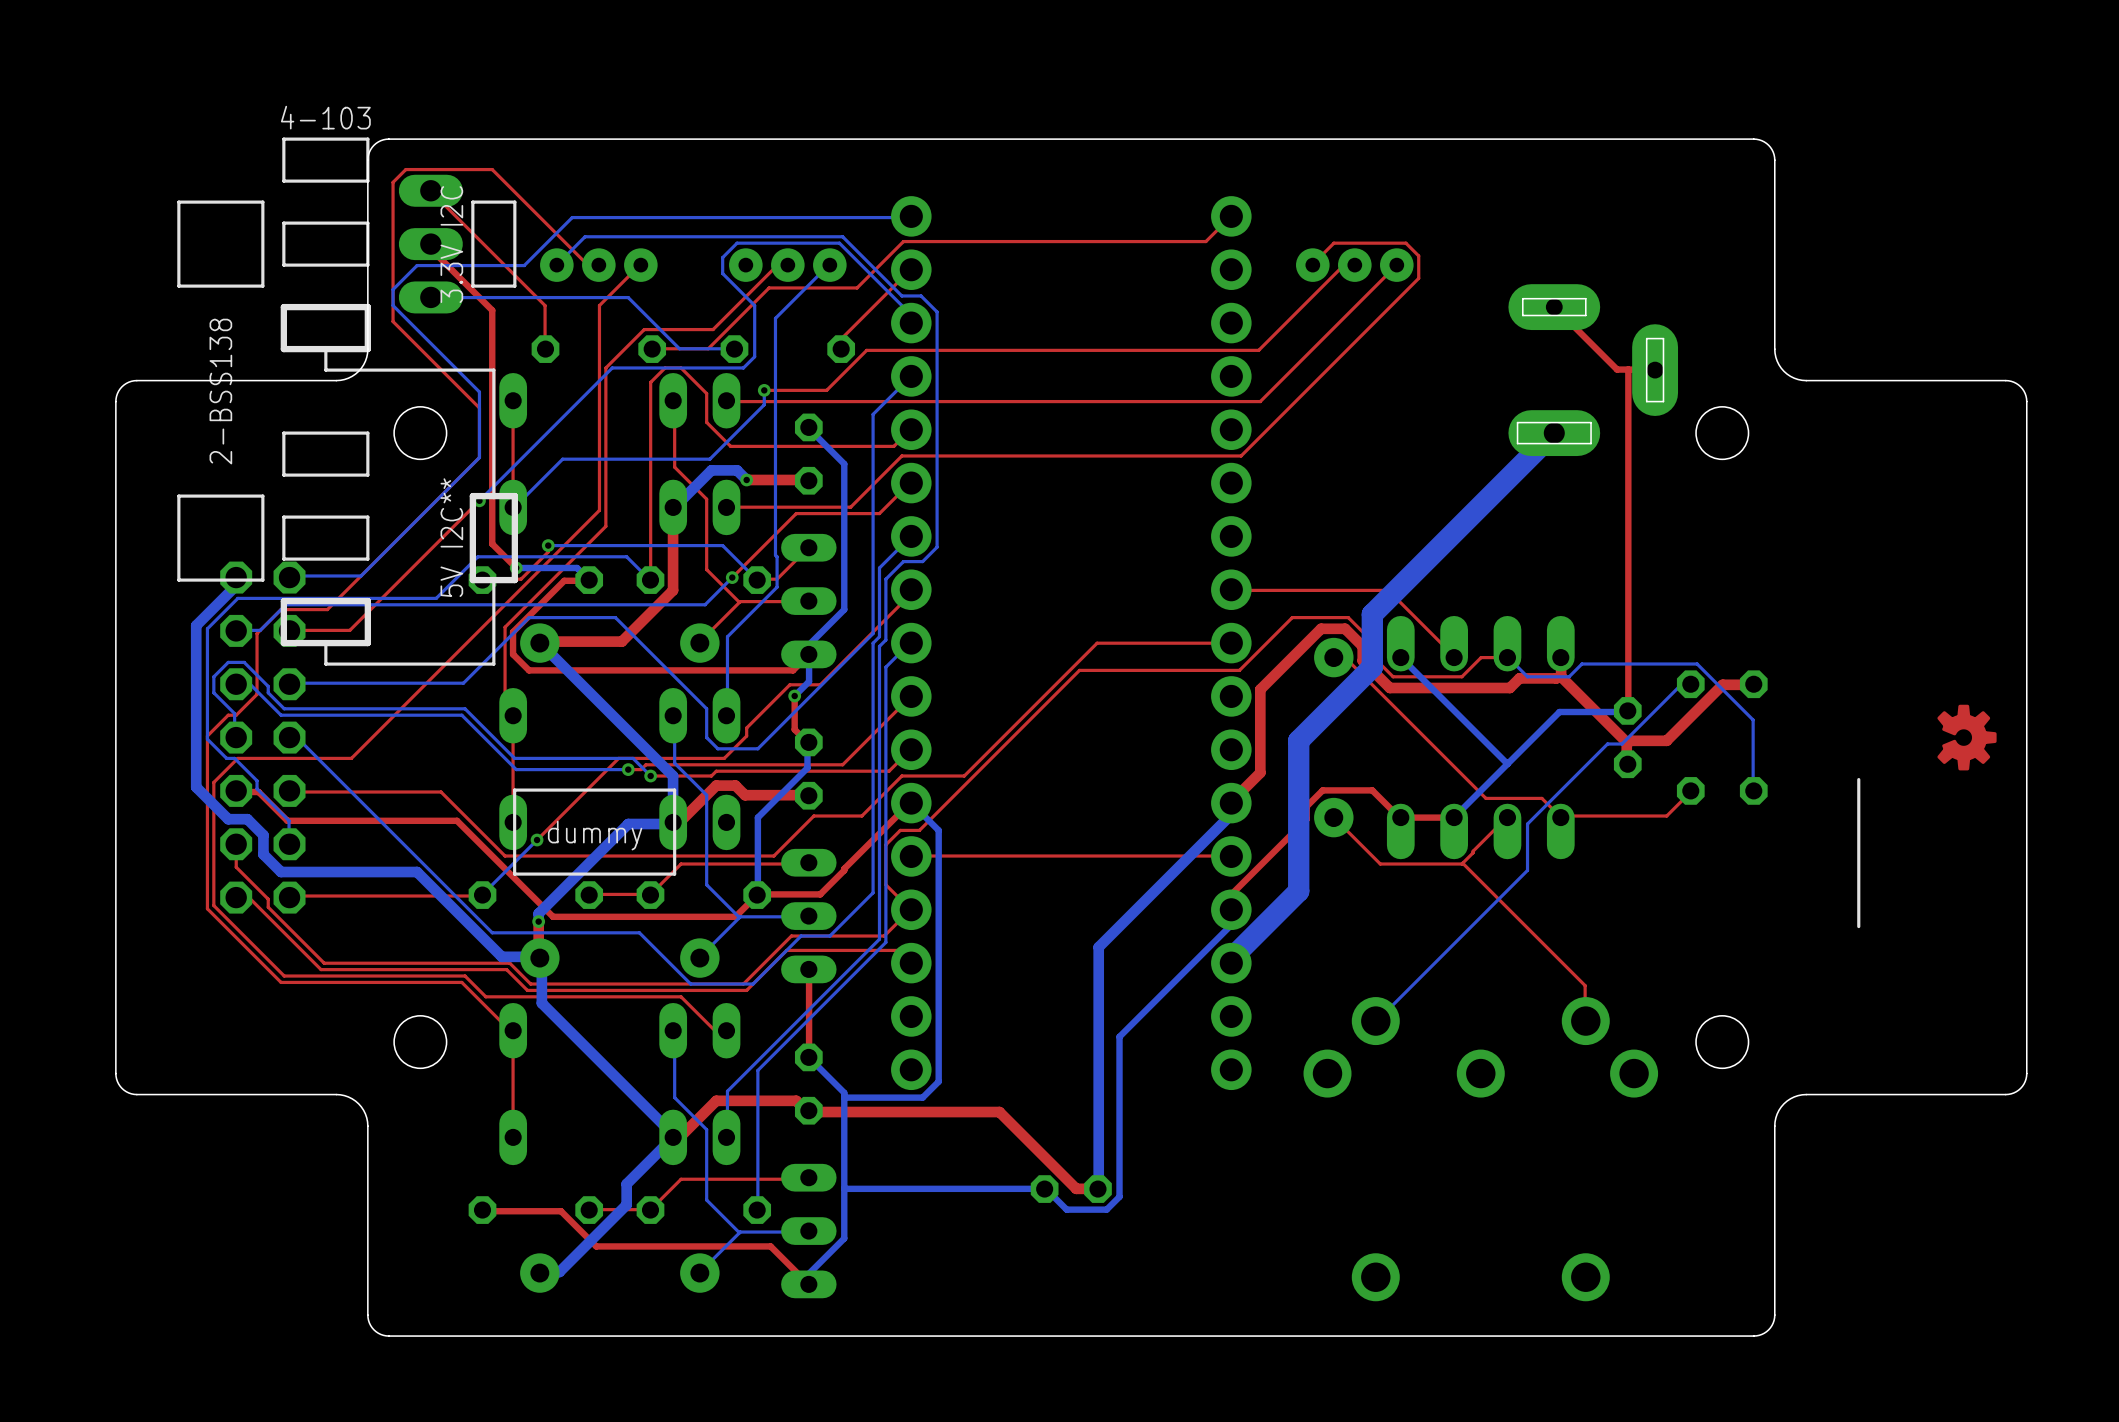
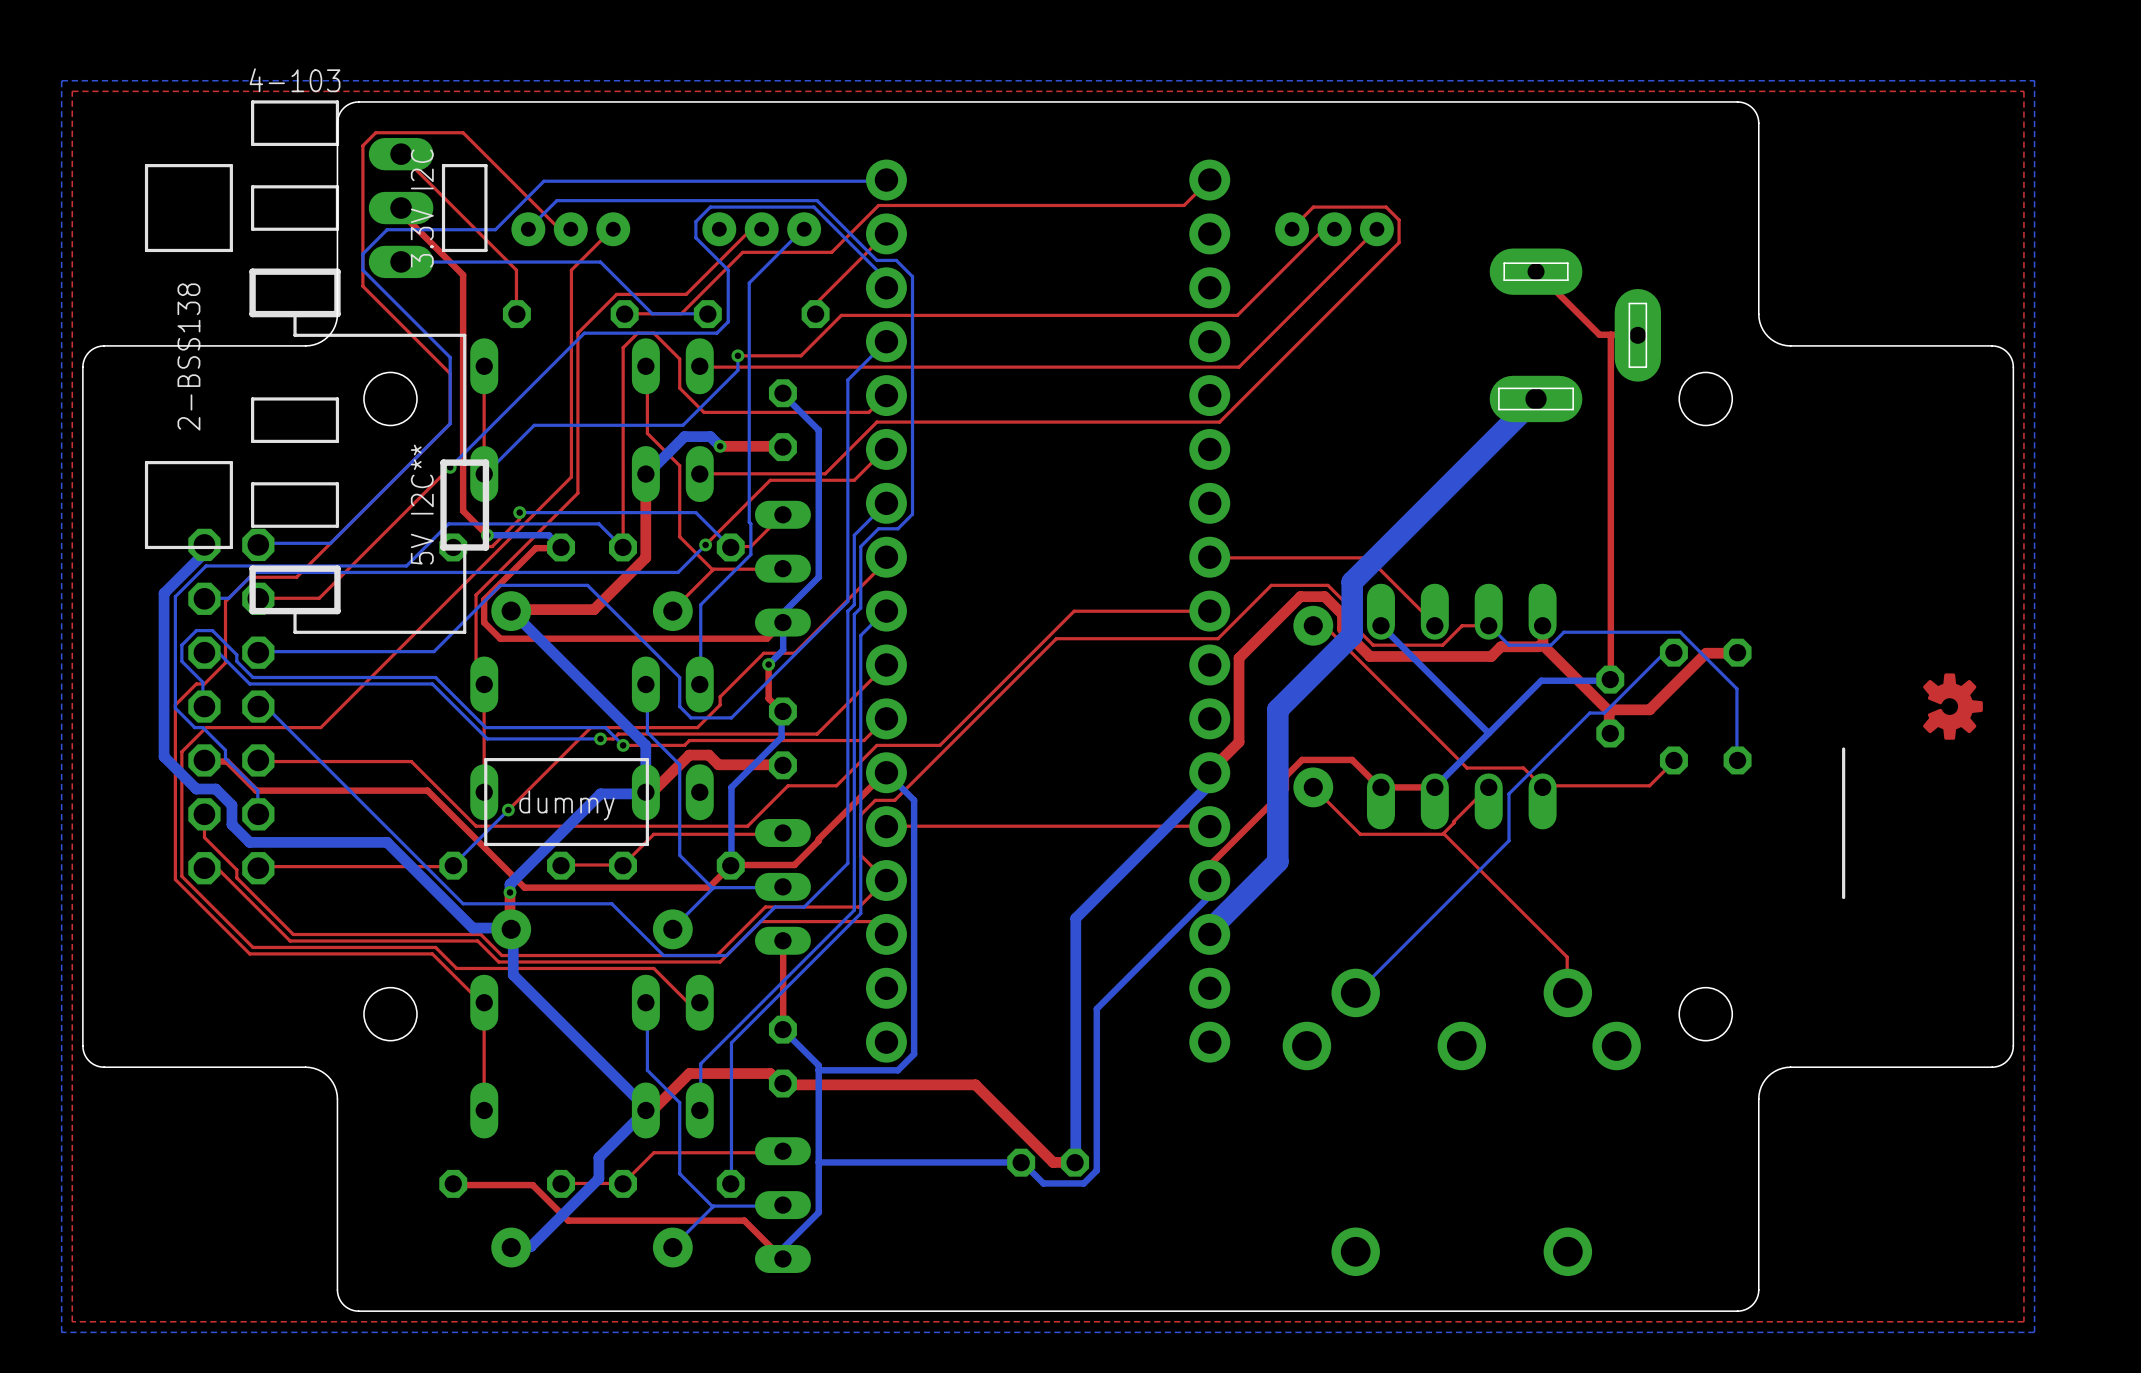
bottom zone outline: none -> (2034, 80) (61, 80) (61, 1332) (2034, 1332) (2034, 80)
top zone outline: none -> (2023, 91) (72, 91) (72, 1321) (2023, 1321) (2023, 91)

